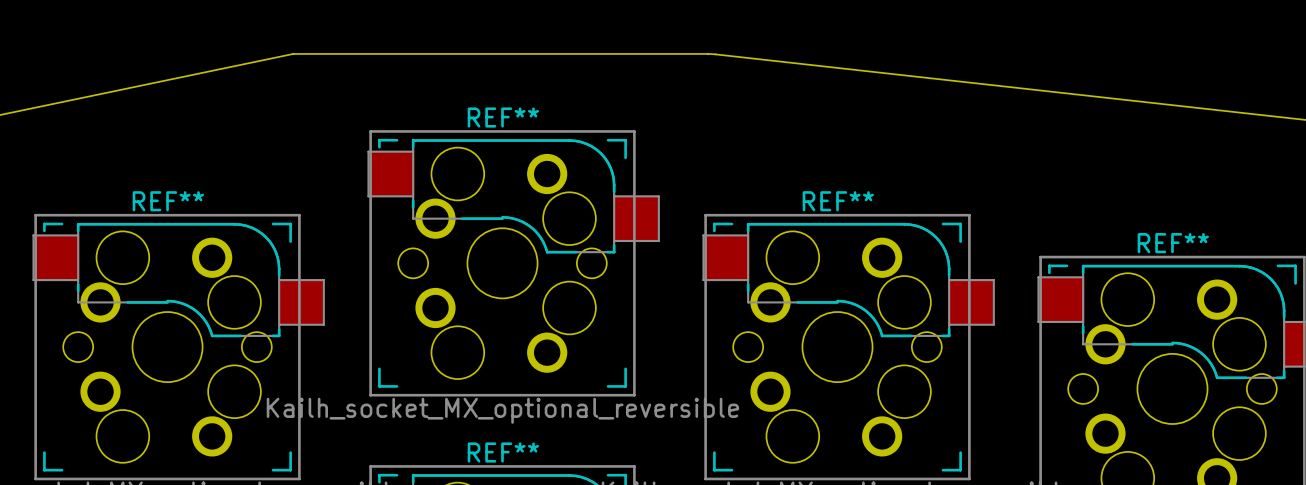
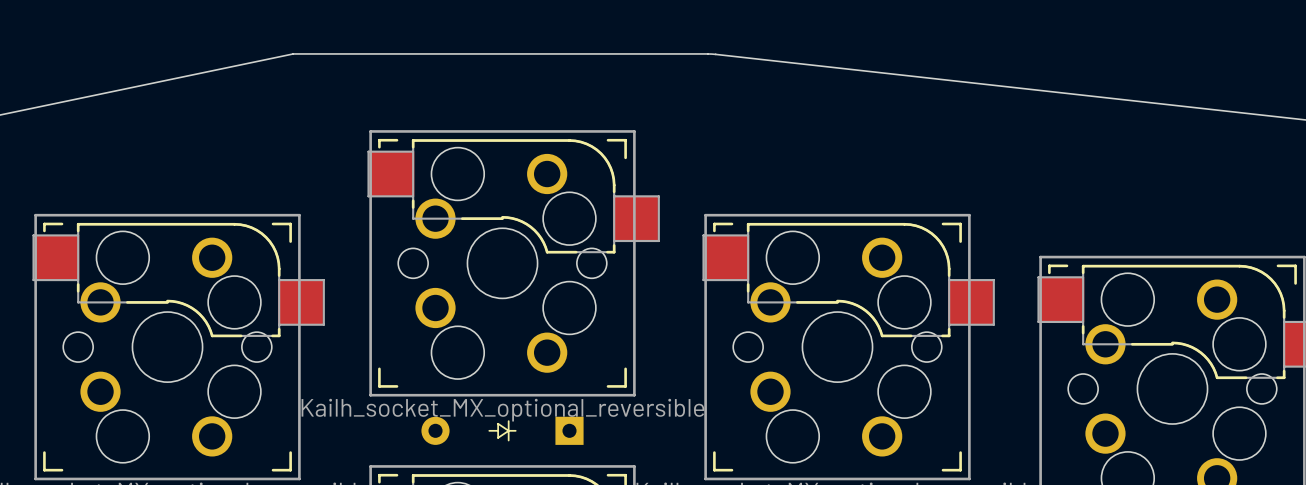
REF** name: REF** (503, 117) -> none
REF** name: REF** (168, 201) -> none
REF** name: REF** (838, 201) -> none
REF** name: REF** (1173, 243) -> none
part: none -> (502, 430)
REF** name: REF** (503, 452) -> none

